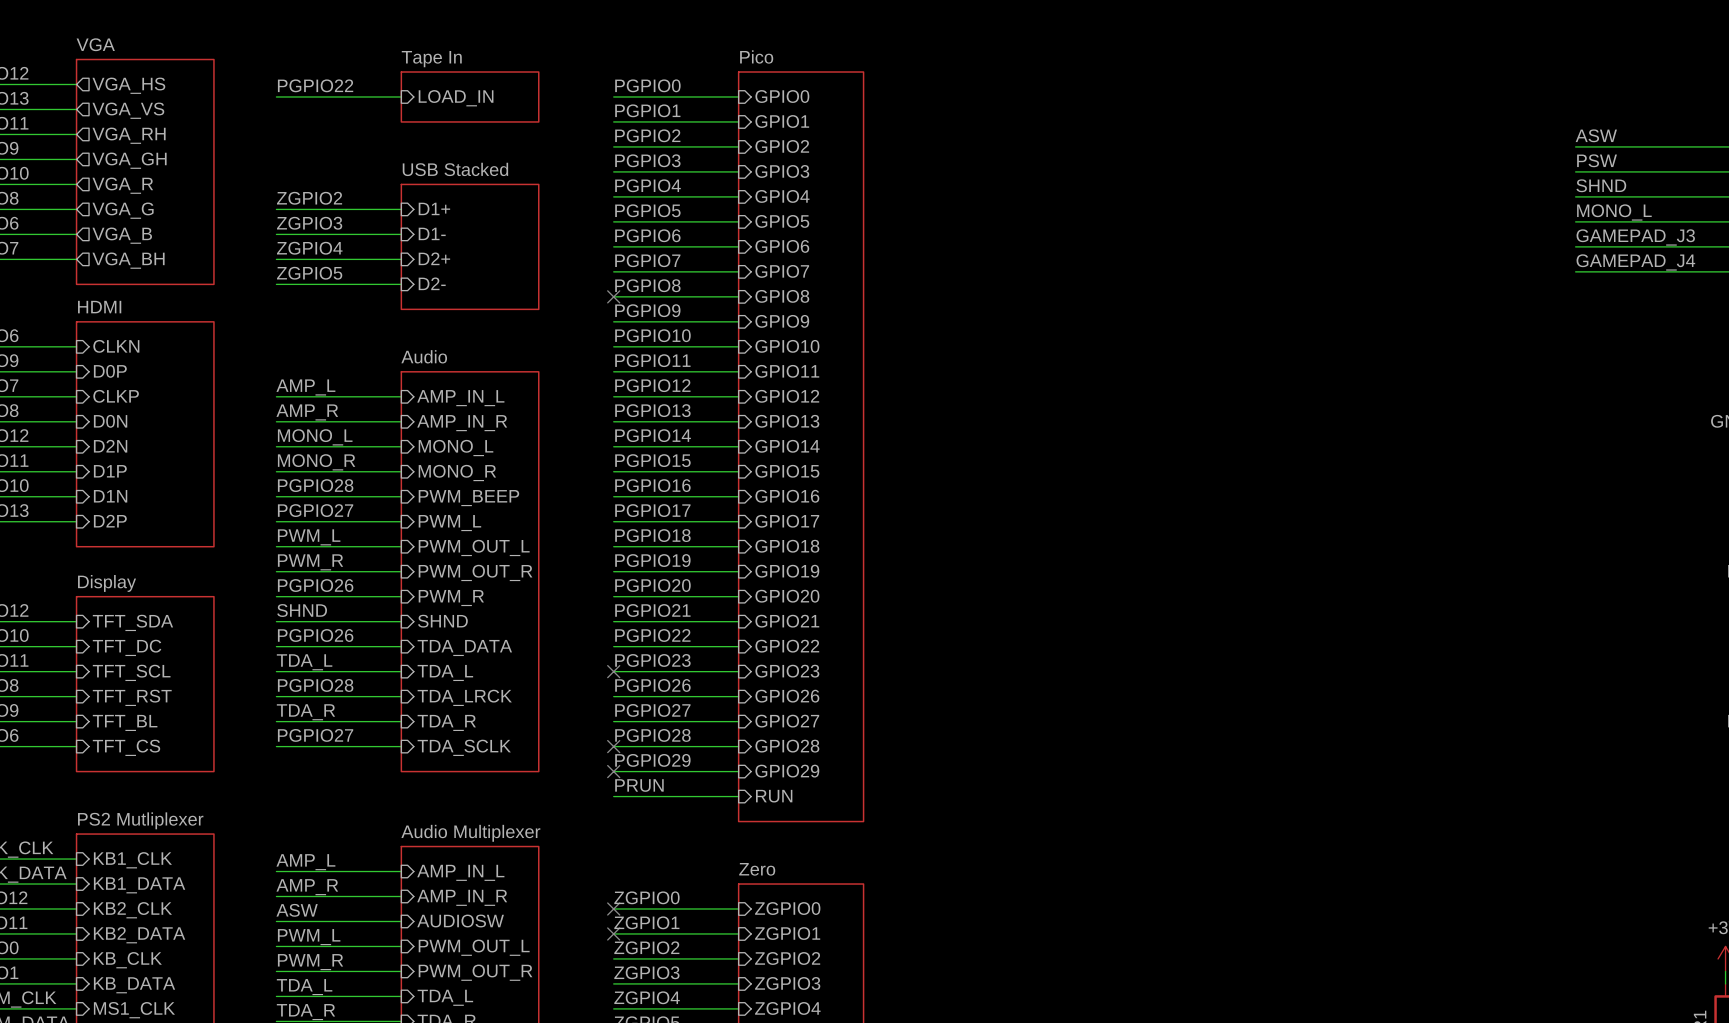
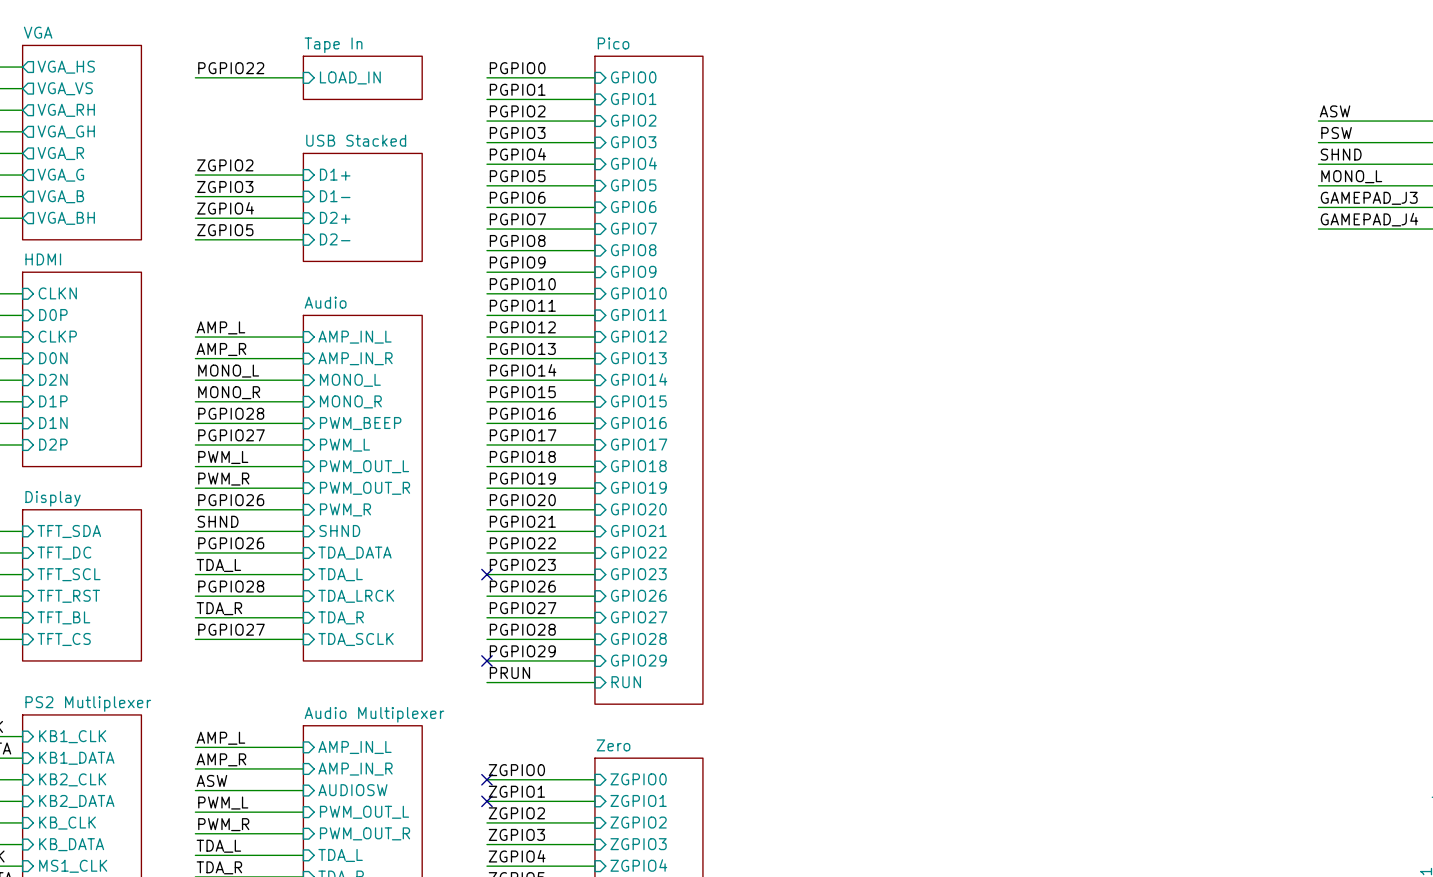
no-connect mark: (613, 296) -> none
no-connect mark: (613, 746) -> none

